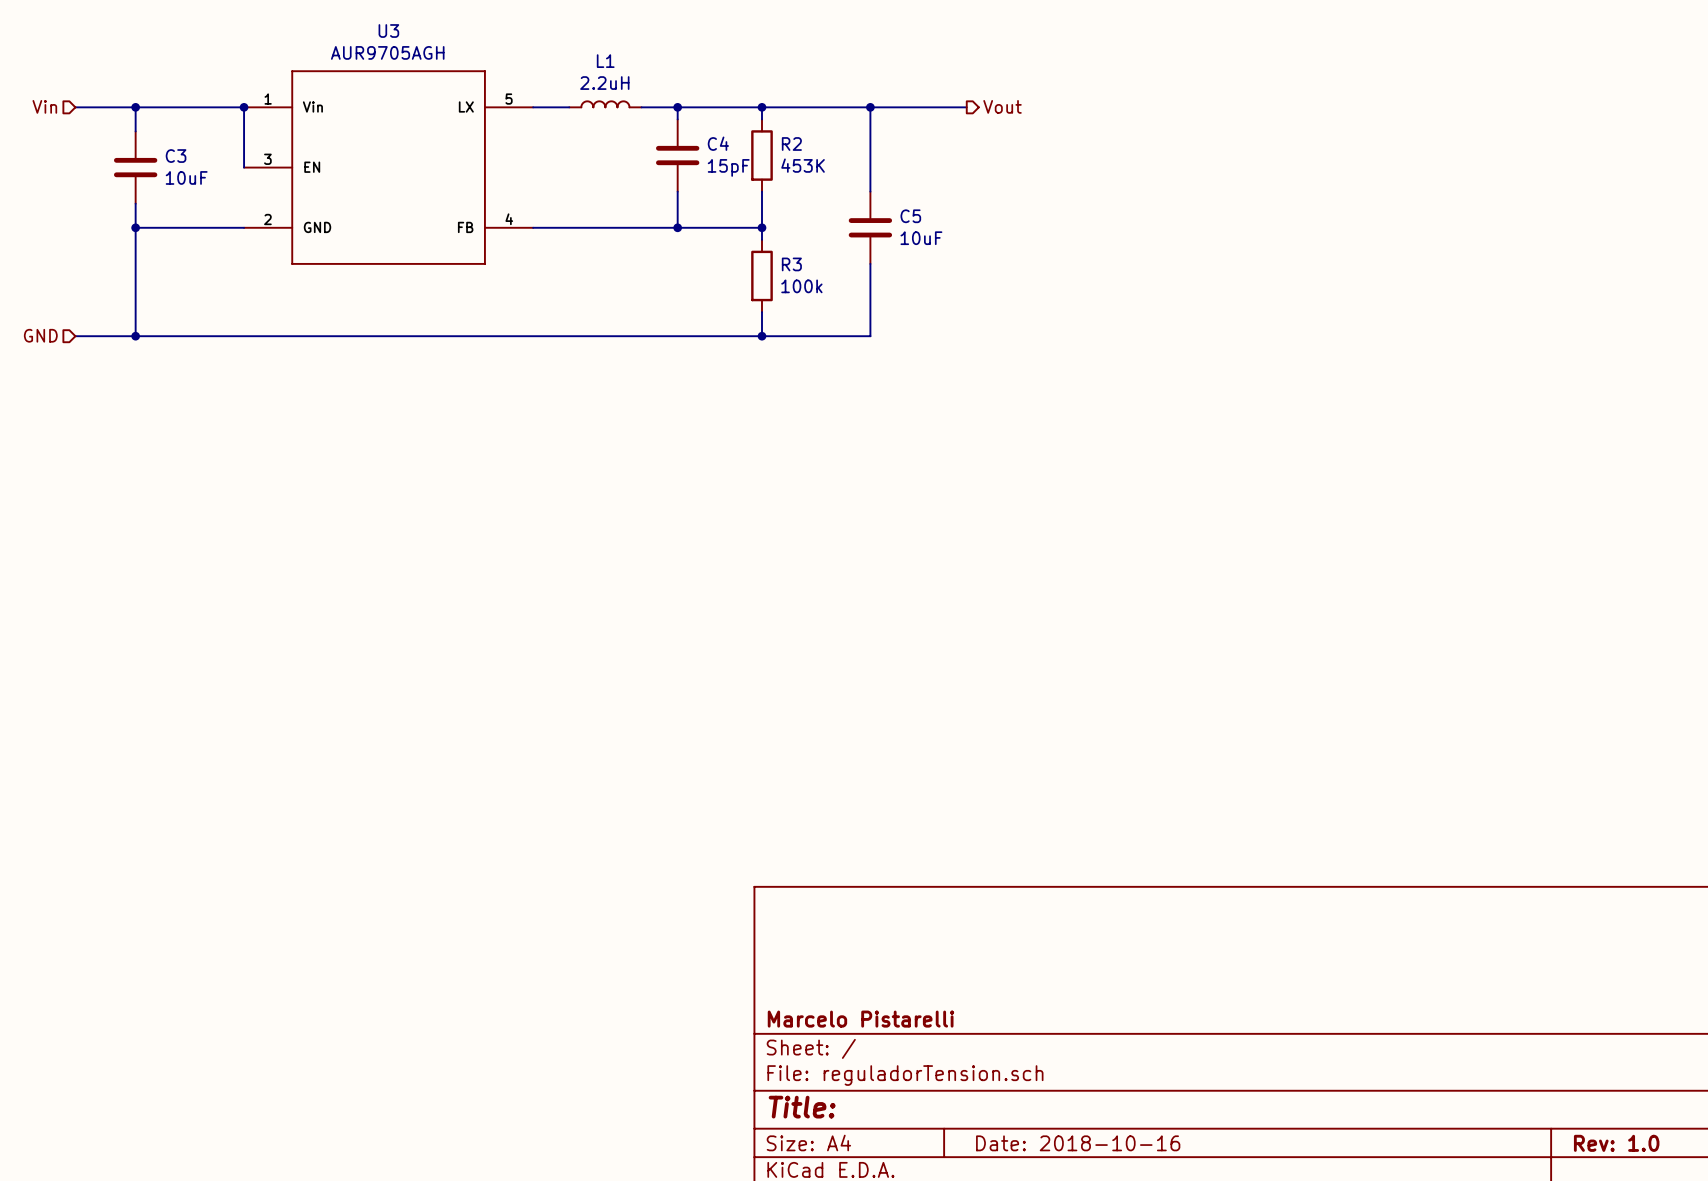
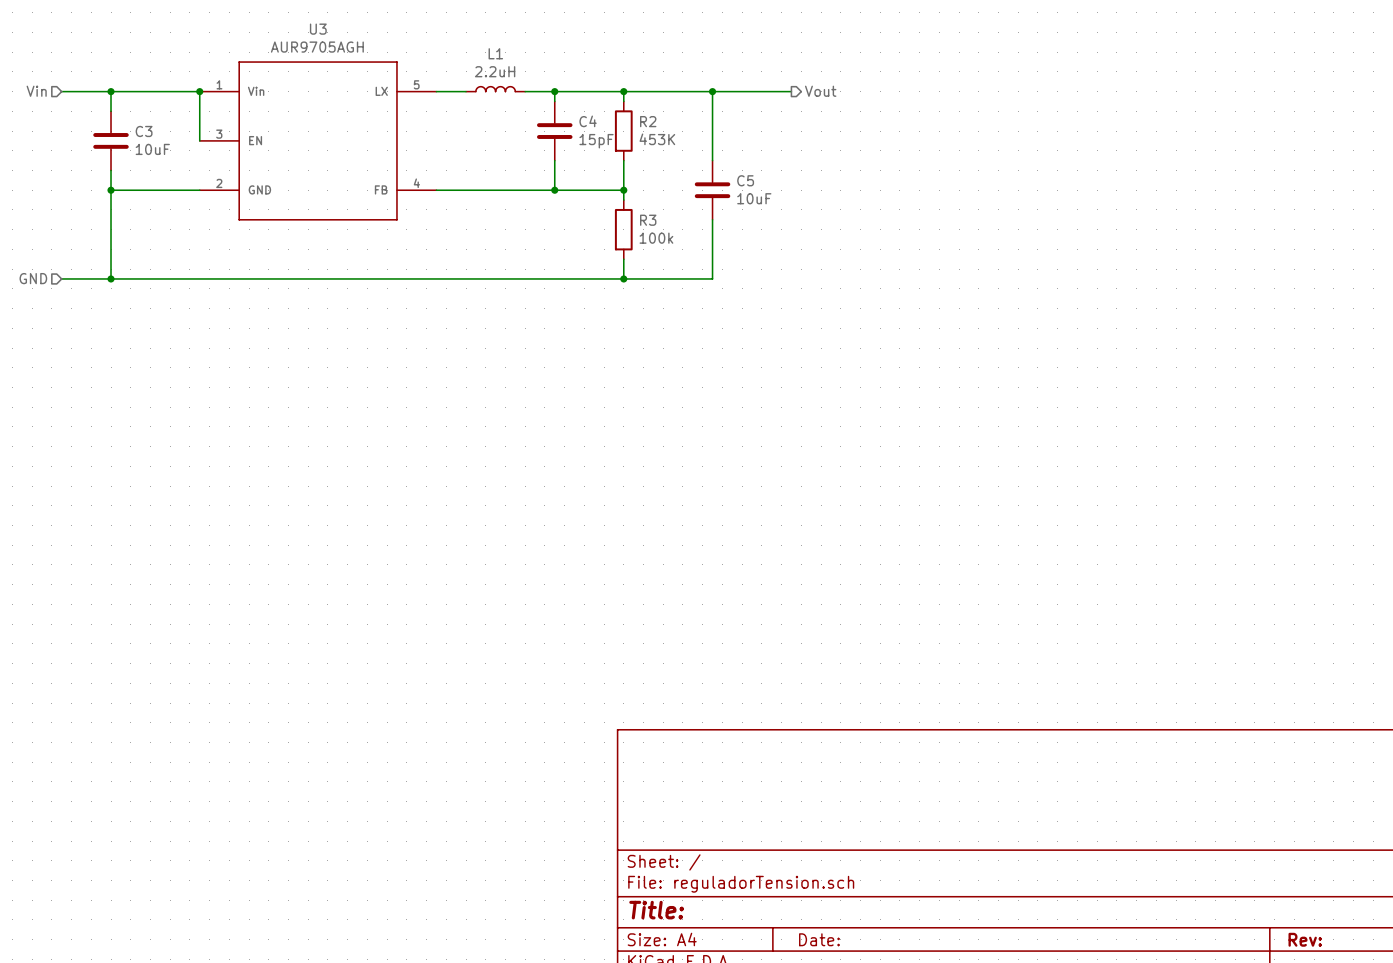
title block: Marcelo Pistarelli (860, 1019) -> none
title block: Date: 2018-10-16 (1078, 1143) -> Date: (819, 939)
title block: Rev: 1.0 (1616, 1143) -> Rev: (1305, 939)

